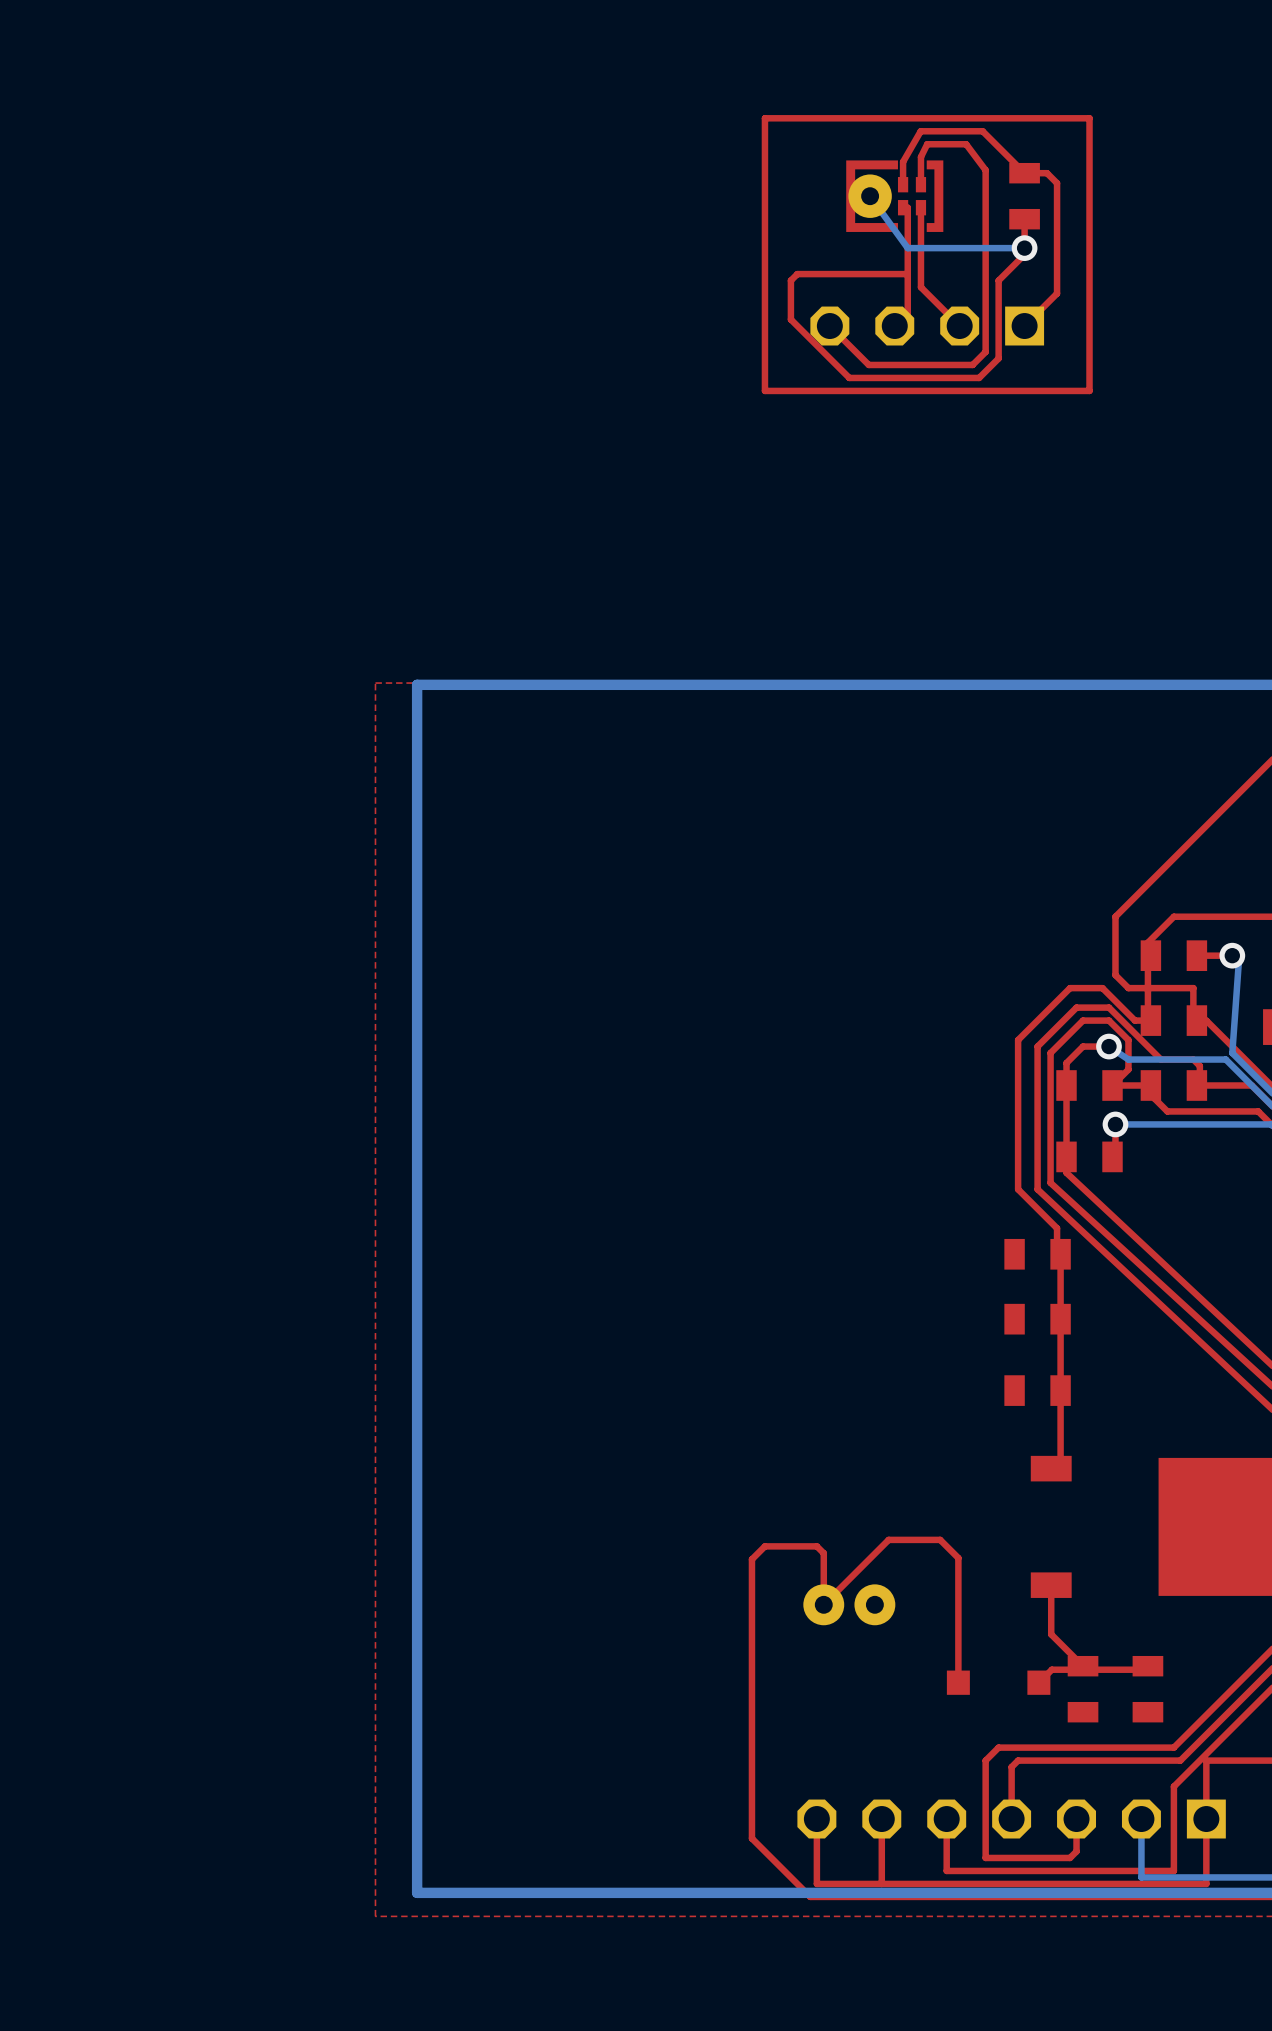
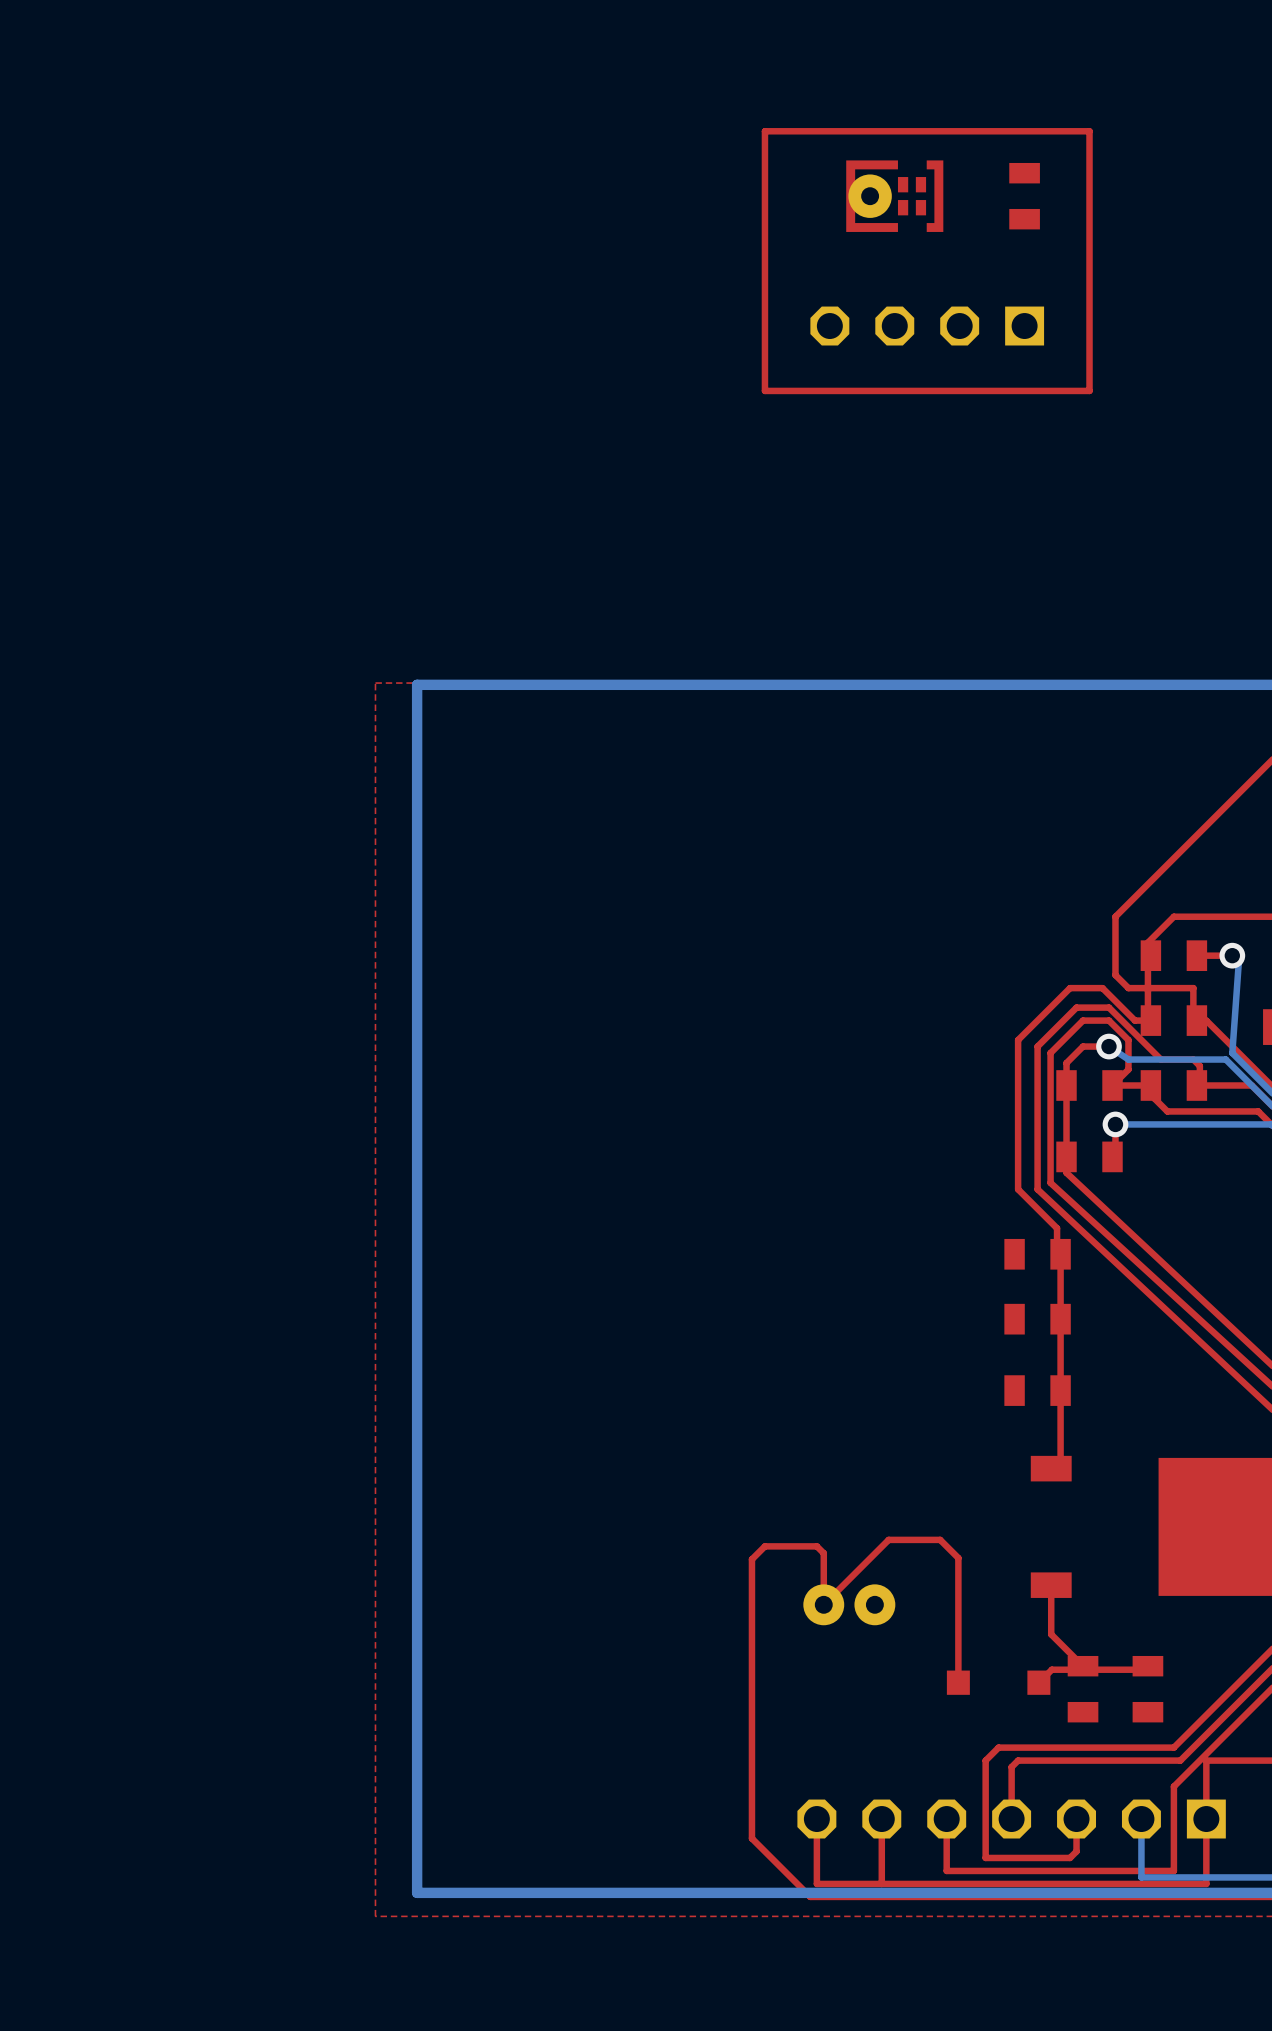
top track: (920, 131) (903, 161) (903, 184) -> (920, 131) (764, 131)
top track: (982, 131) (1024, 173) (1047, 173) (1057, 183) (1057, 293) (1024, 326) -> (982, 131) (1089, 131)
top track: (1089, 131) (1089, 118) (764, 118) (764, 131) -> none
top track: (920, 184) (920, 157) (927, 144) (966, 144) (985, 170) (985, 351) (972, 364) (868, 364) (829, 326) -> none
bottom track: (870, 196) (907, 248) (1024, 248) -> none
top track: (903, 207) (907, 207) (907, 313) (894, 326) -> none
top track: (920, 207) (920, 287) (959, 326) -> none
top track: (1024, 219) (1024, 254) (998, 280) (998, 358) (979, 377) (849, 377) (790, 319) (790, 280) (797, 274) (907, 274) -> none
via: (1024, 248) -> none

